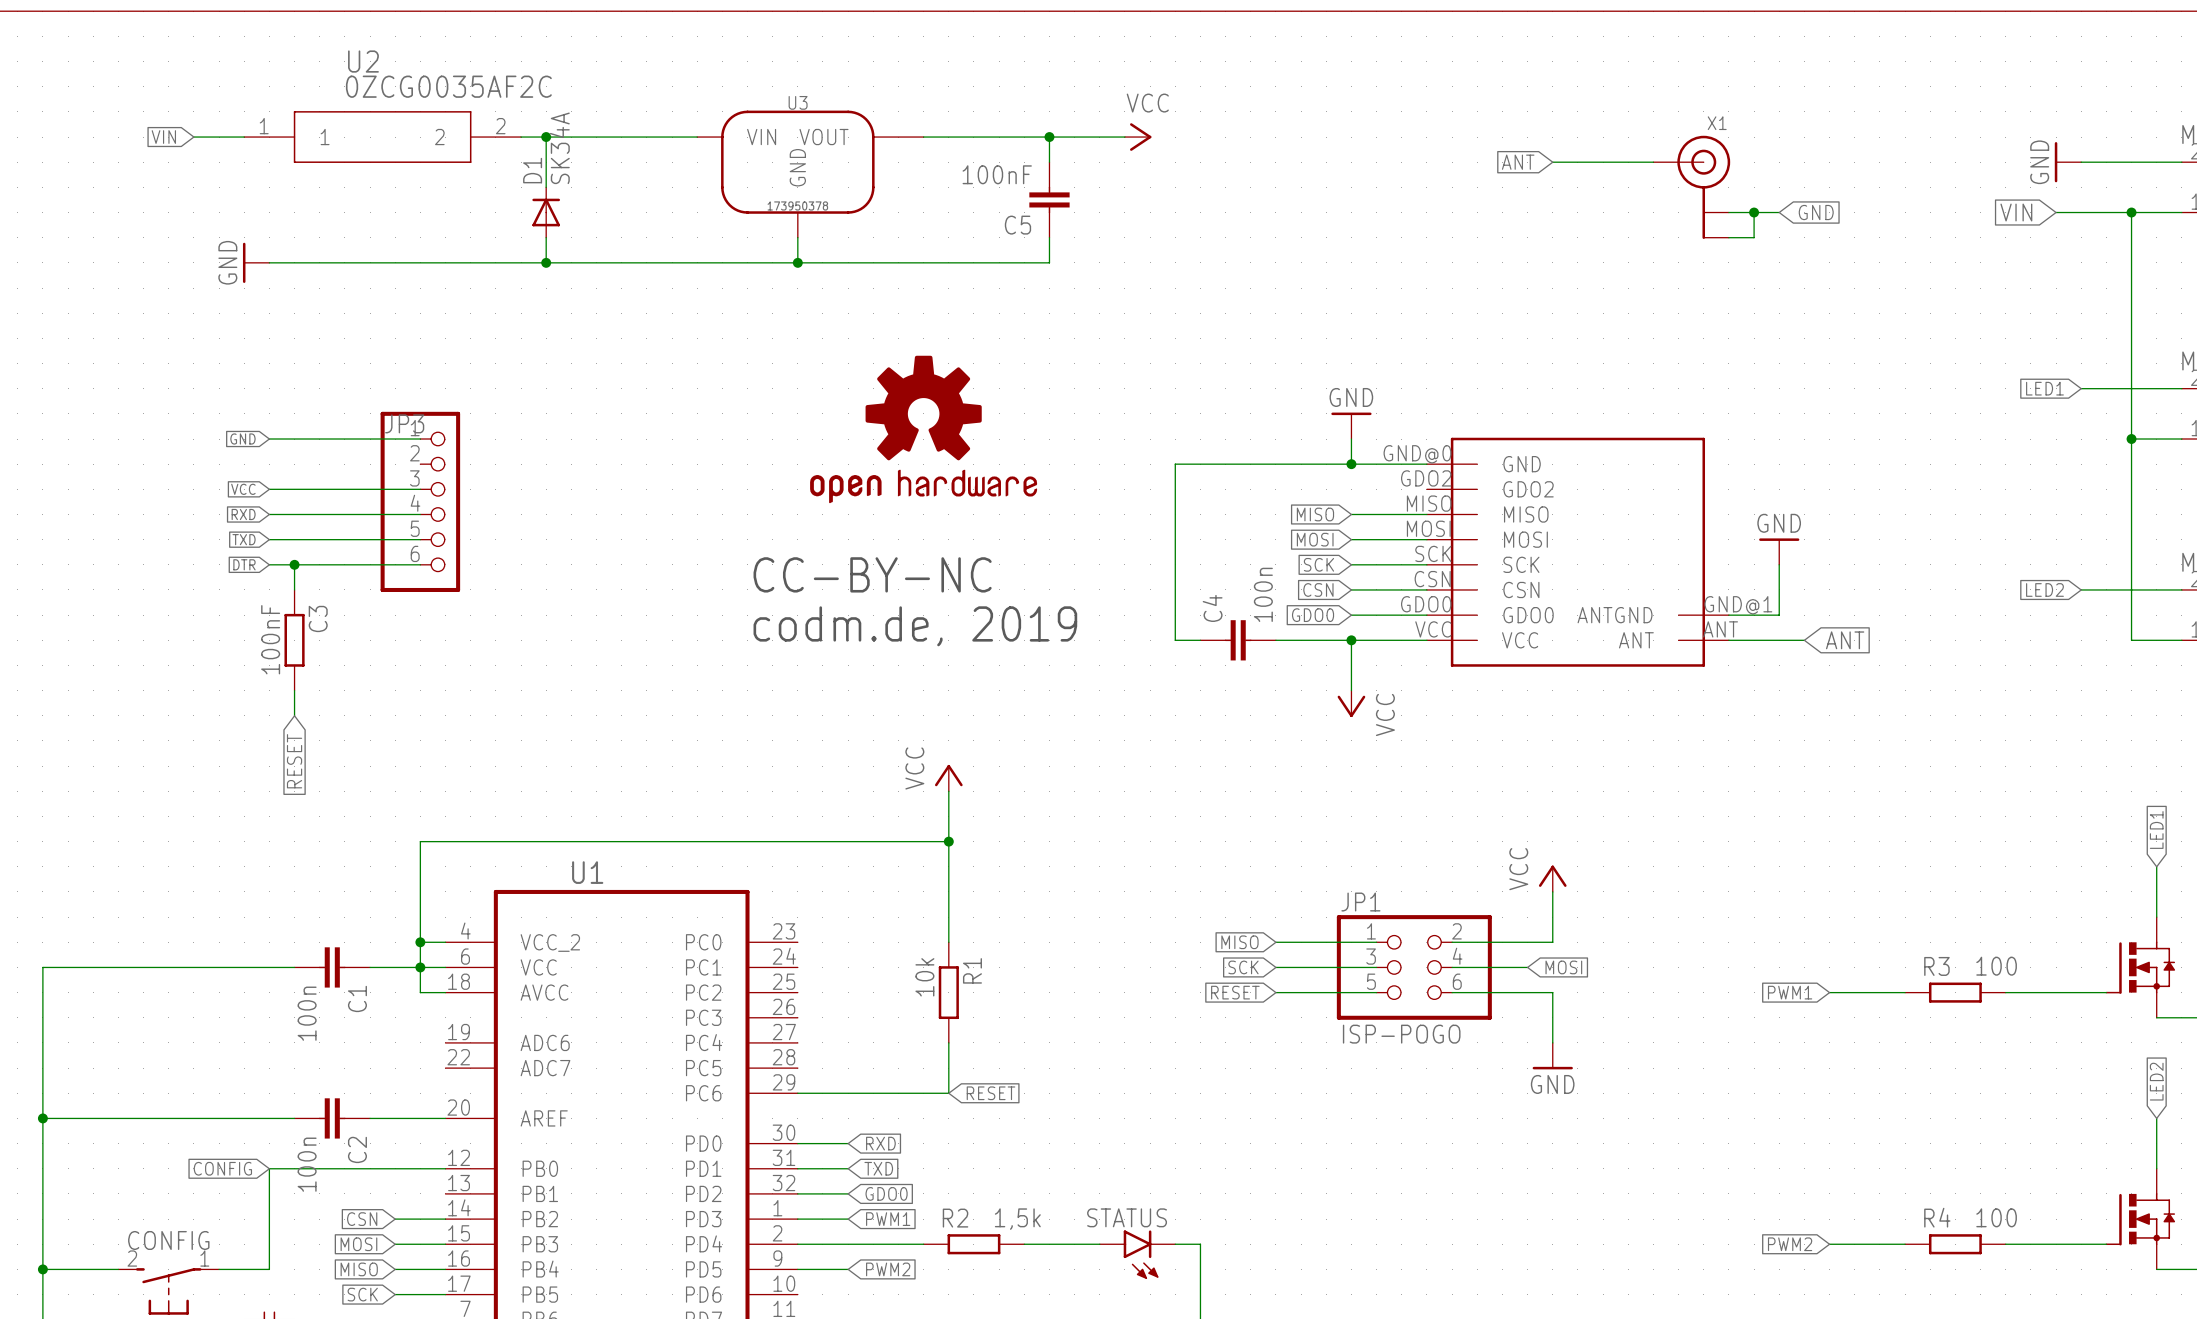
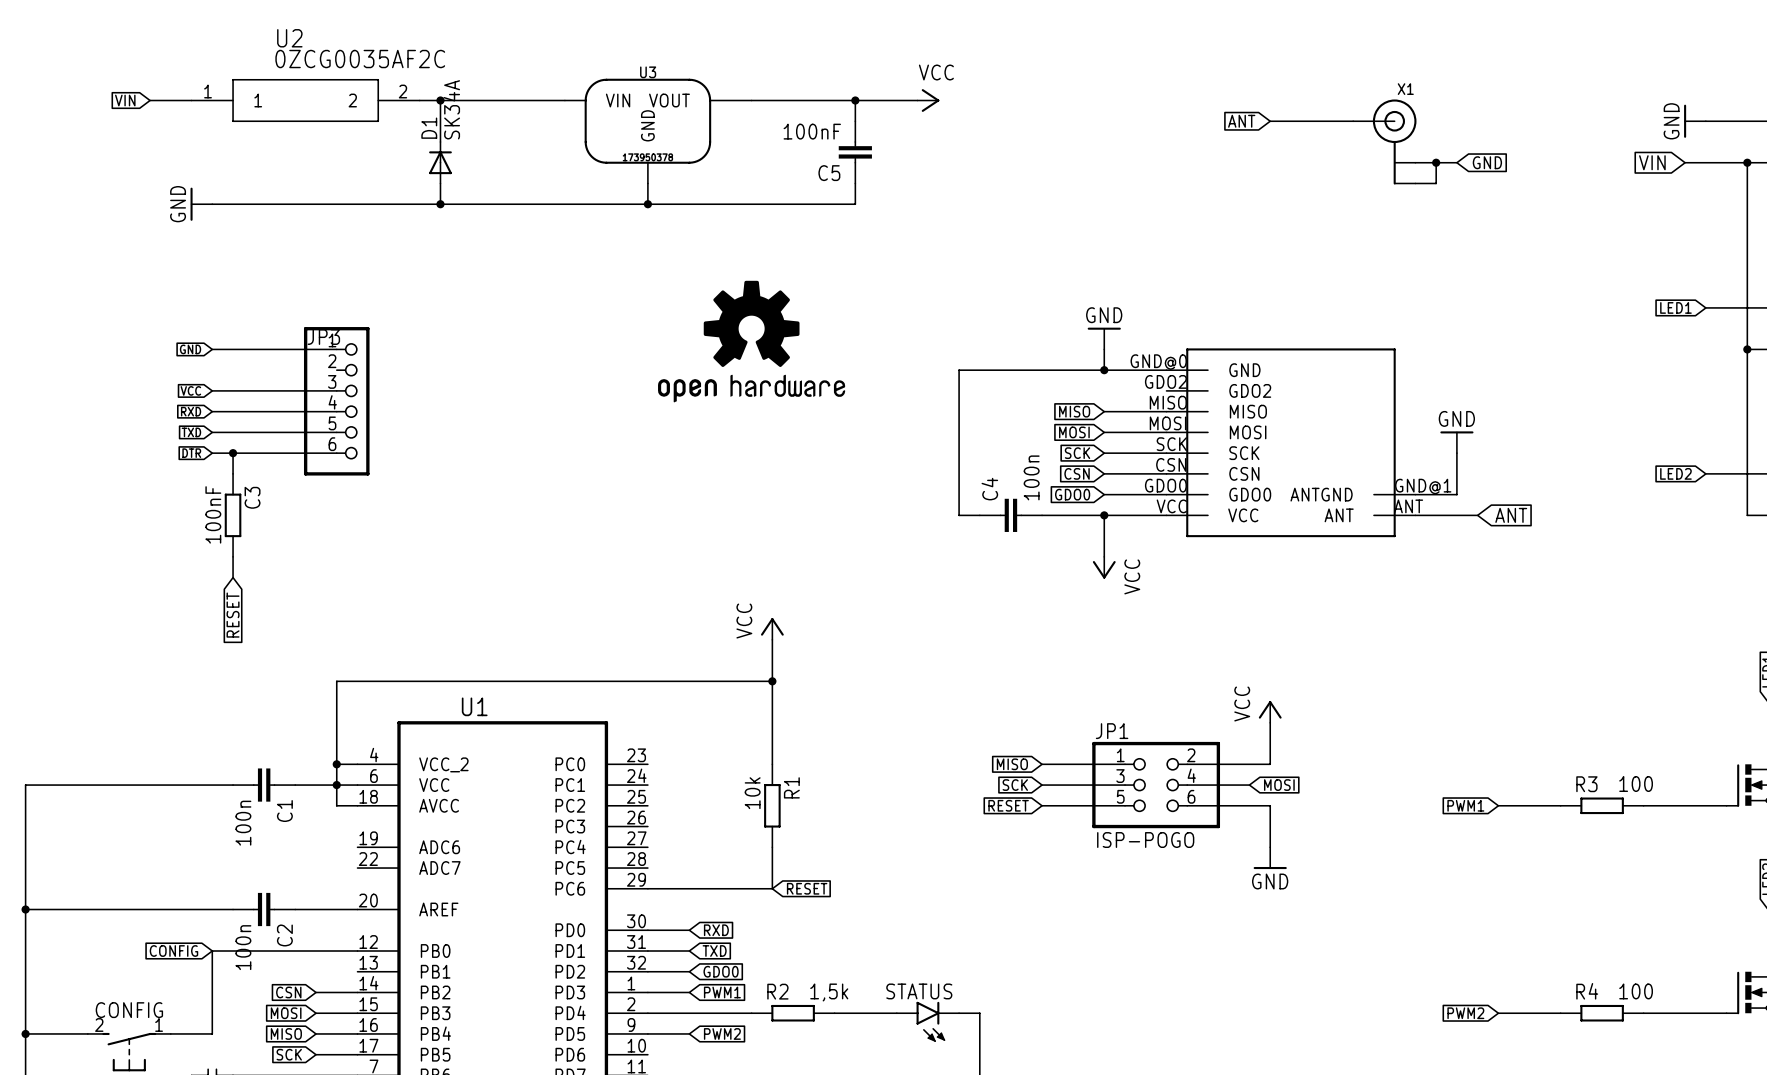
text: CC-BY-NC (872, 574) -> none
text: codm.de, 2019 (915, 626) -> none

